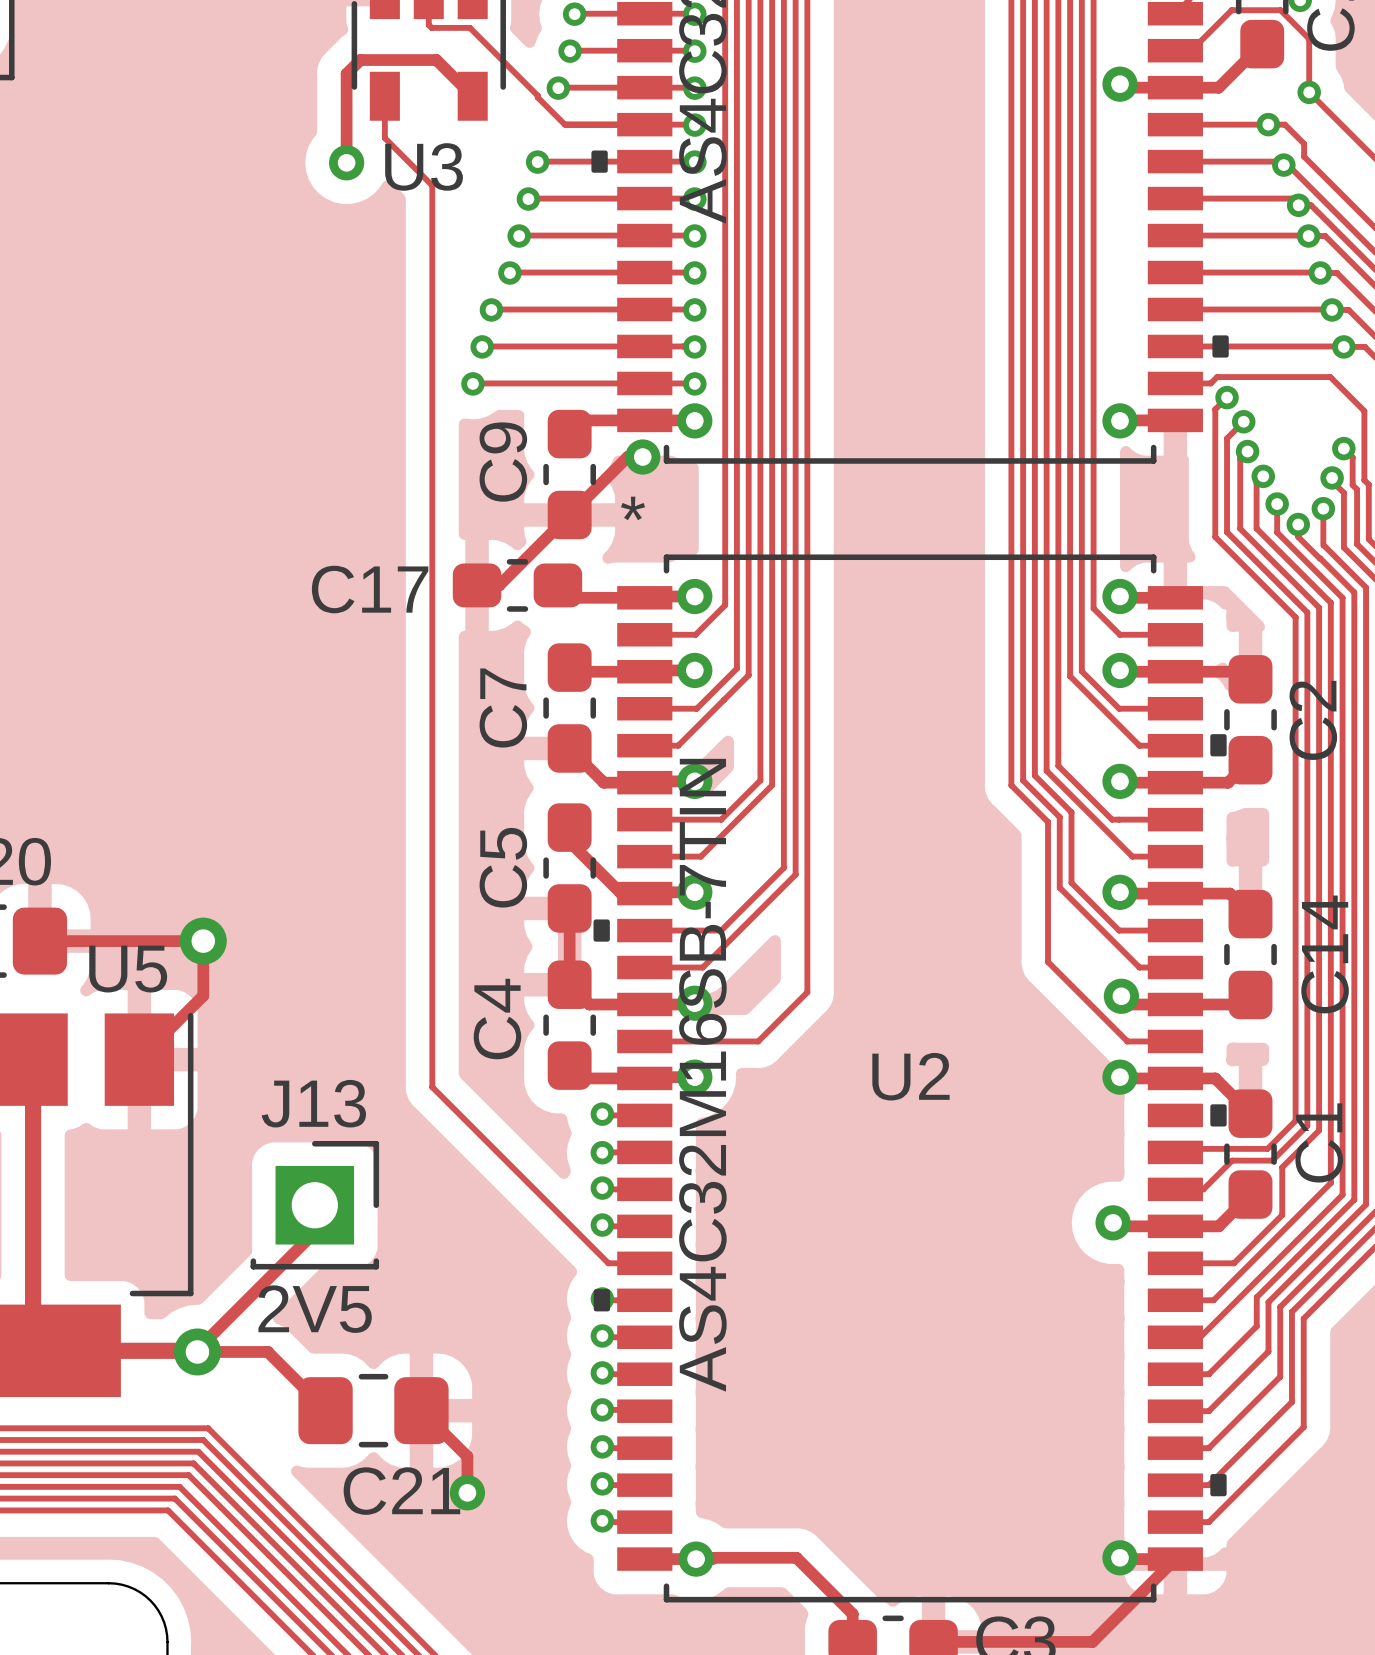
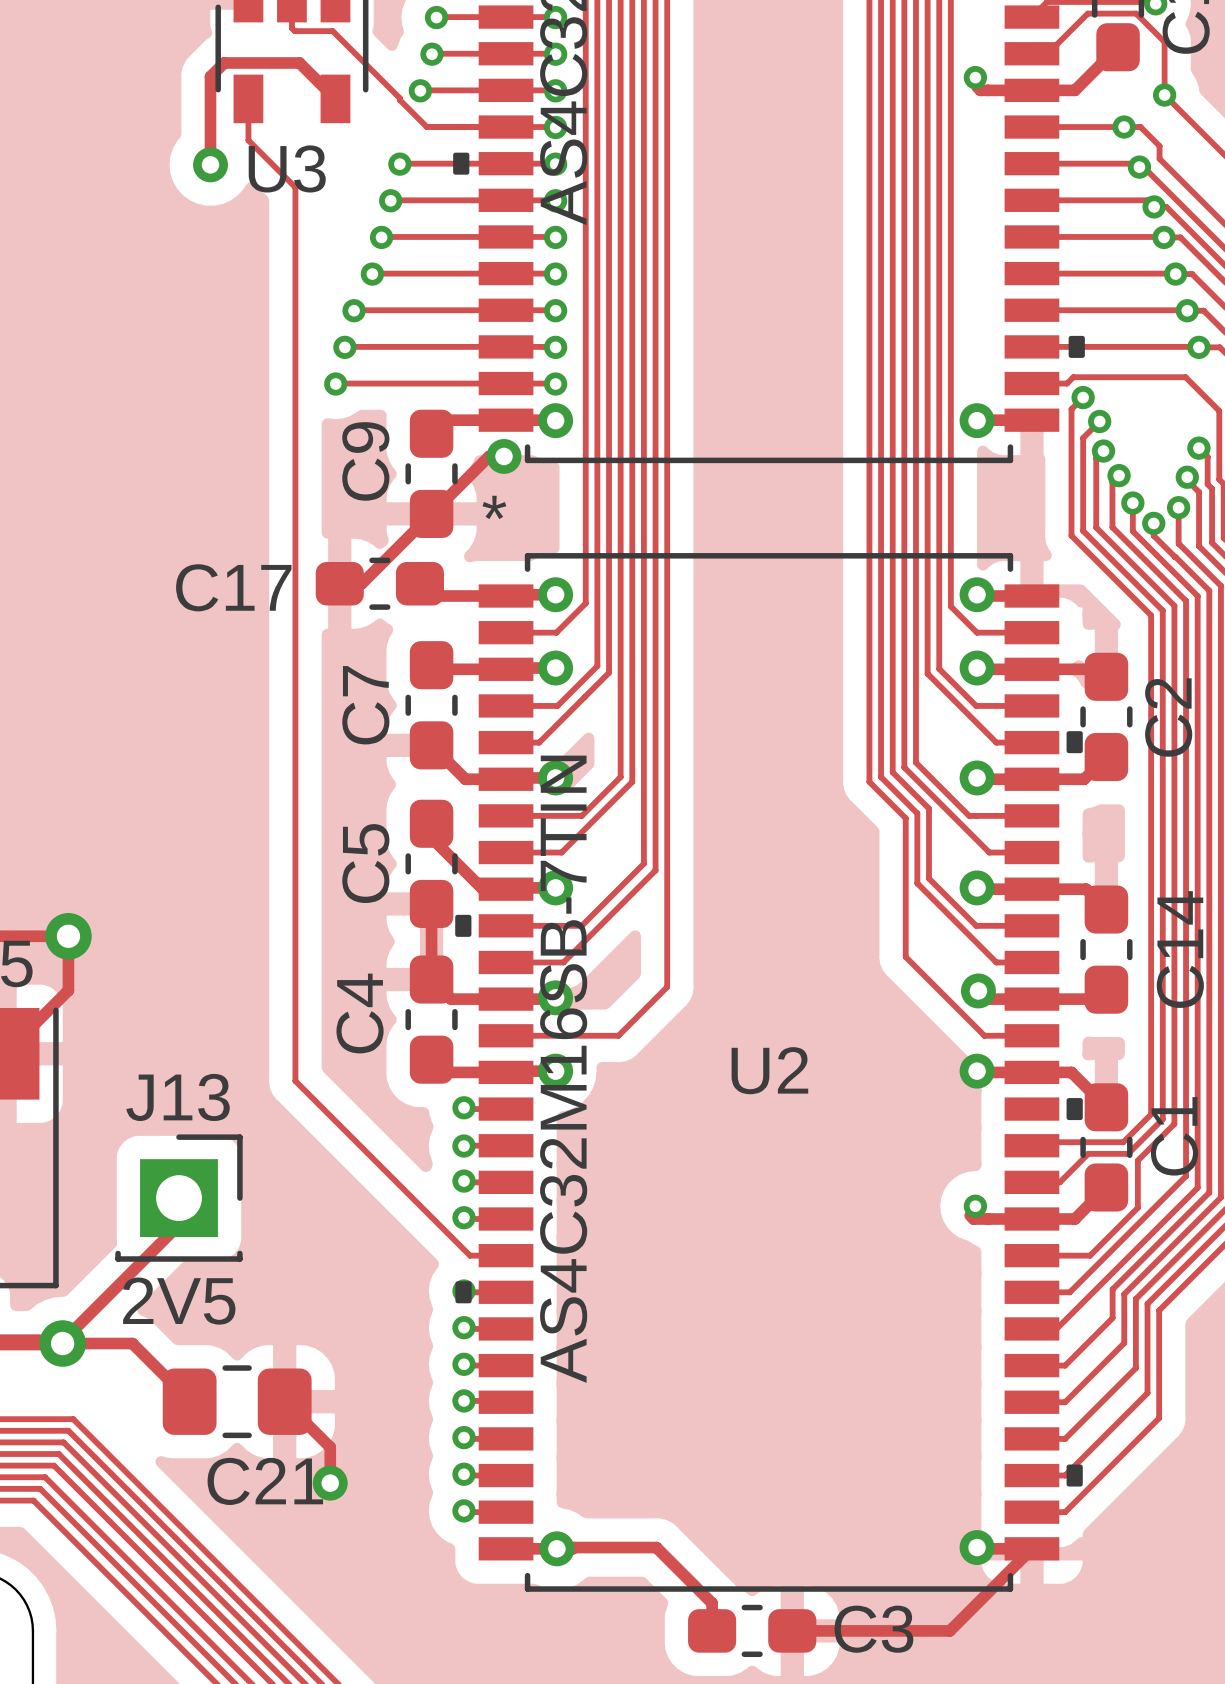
via size: [1102, 66, 1138, 102] -> [963, 65, 988, 90]
via size: [1095, 1205, 1131, 1241] -> [963, 1194, 988, 1218]

